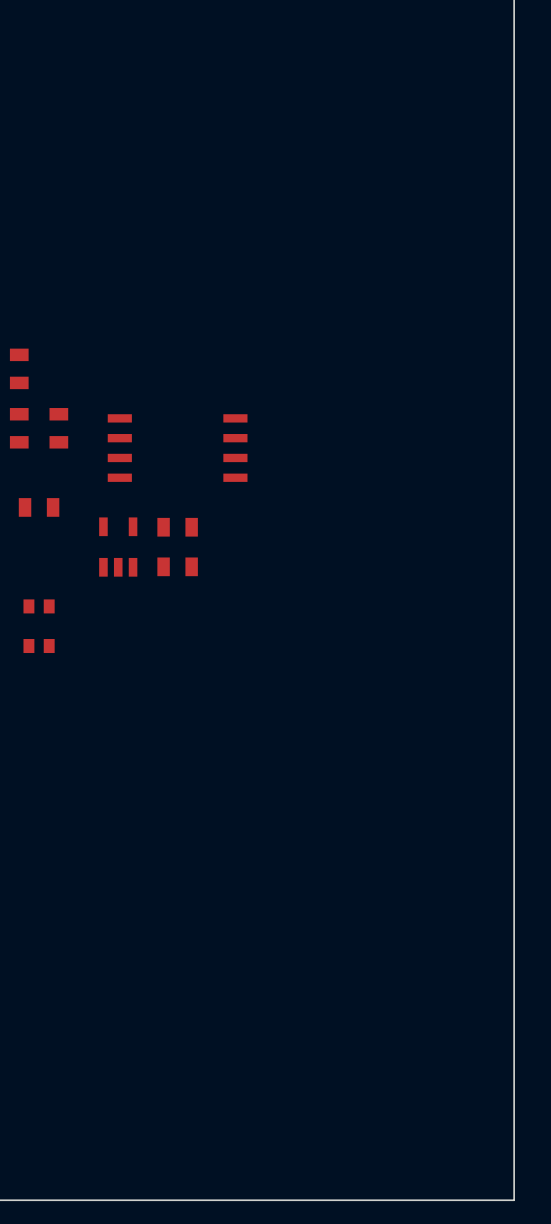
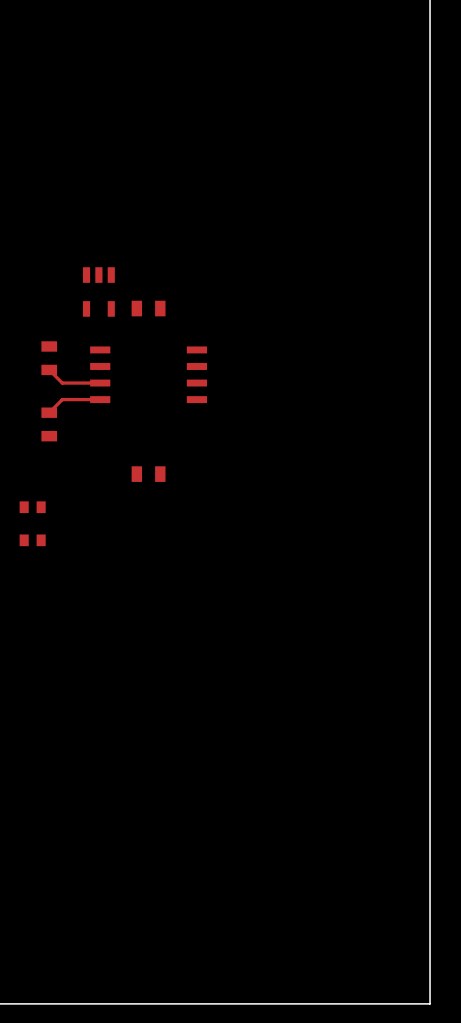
part: (19, 368) -> none
part: none -> (148, 308)
part: (19, 428) -> none
top track: none -> (49, 369) (62, 383) (100, 383)
top track: none -> (100, 399) (62, 399) (49, 412)
part rotation: 0° (39, 507) -> 90° clockwise (49, 424)
part: (177, 527) -> none
part rotation: 0° (118, 547) -> 180° (98, 291)
part position: (118, 547) -> (98, 291)

